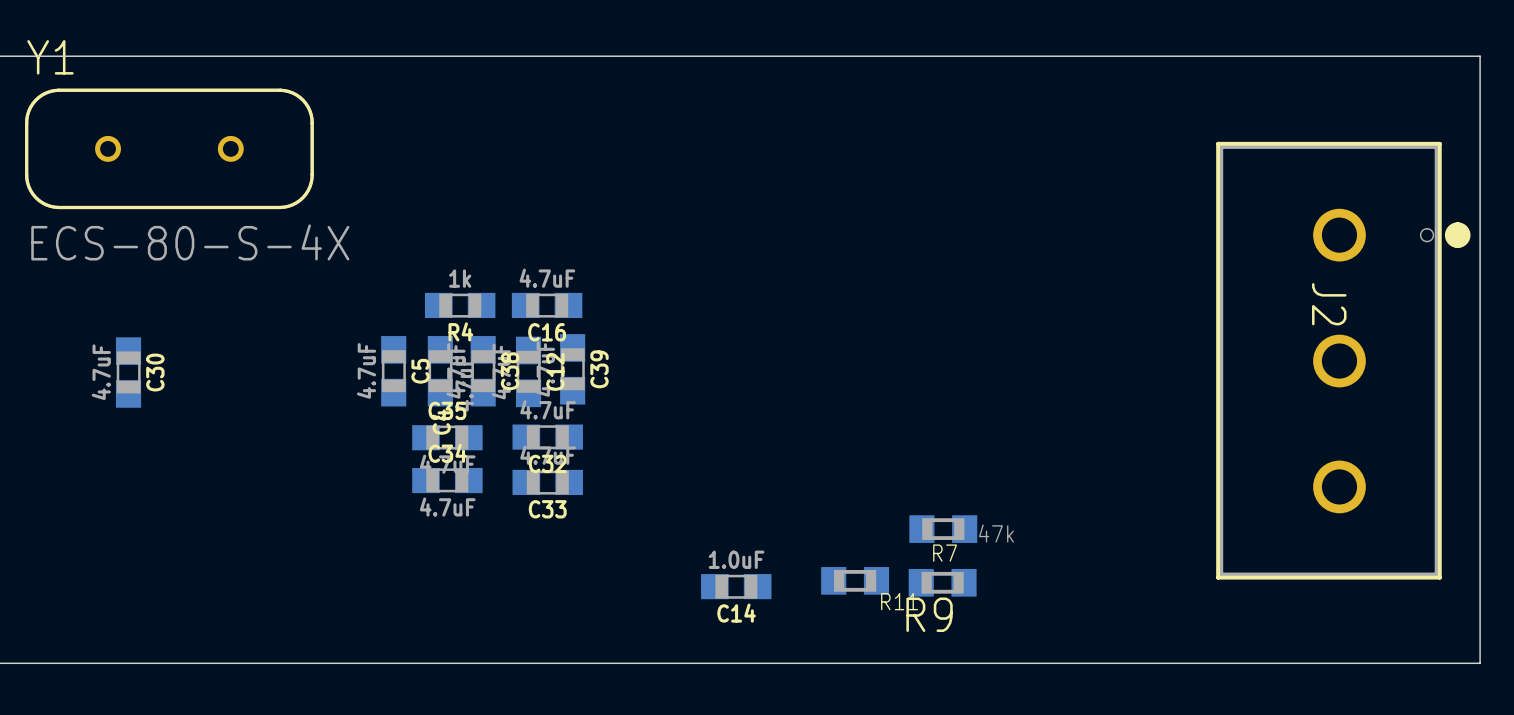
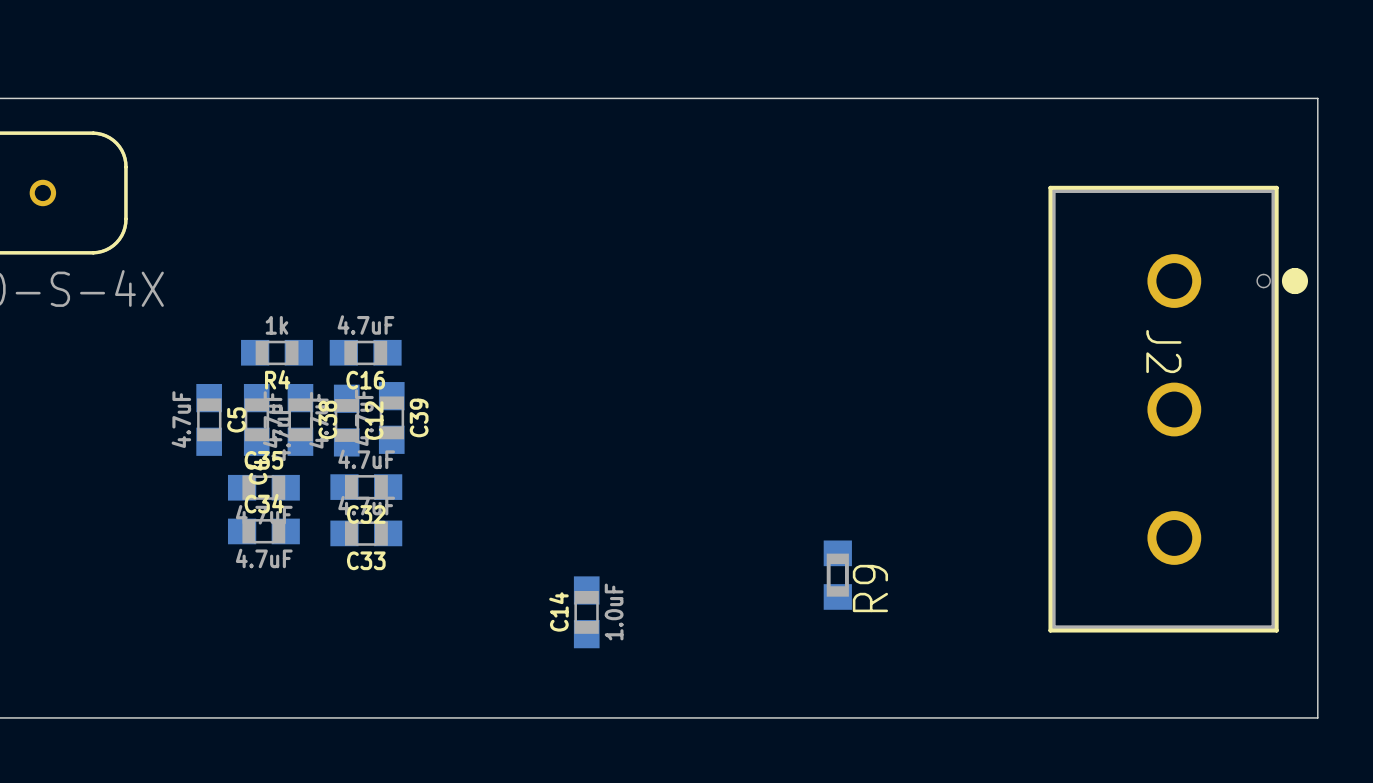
R7: 47k (943, 529) -> none
R11: (855, 580) -> none
R9 rotation: 0° (942, 582) -> 90° clockwise (837, 575)
R9 position: (942, 582) -> (837, 575)
C14 rotation: 0° (736, 586) -> 90° clockwise (586, 612)
R9 name position: R9 (929, 614) -> R9 (870, 588)

